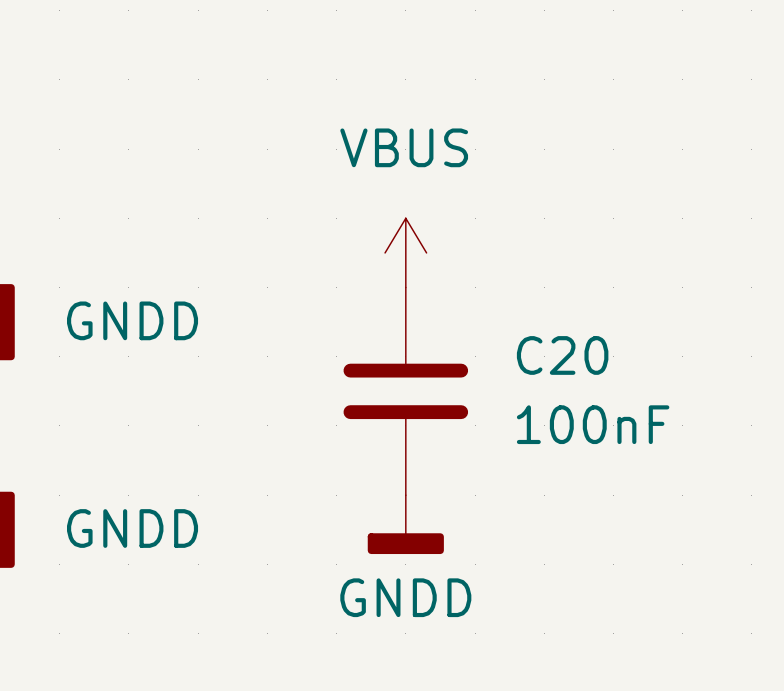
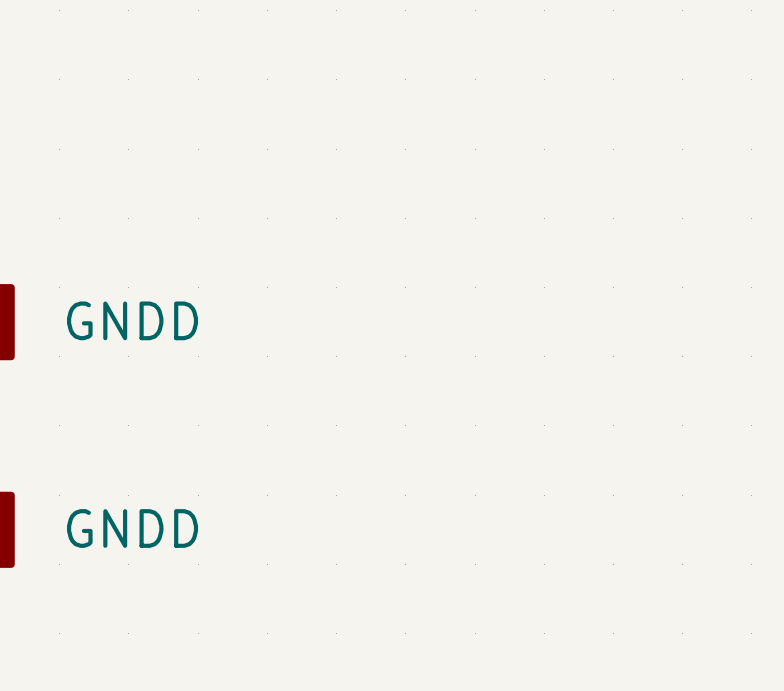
power symbol: VBUS (405, 252) -> none
C20: 100nF (405, 391) -> none
power symbol: GNDD (405, 524) -> none

